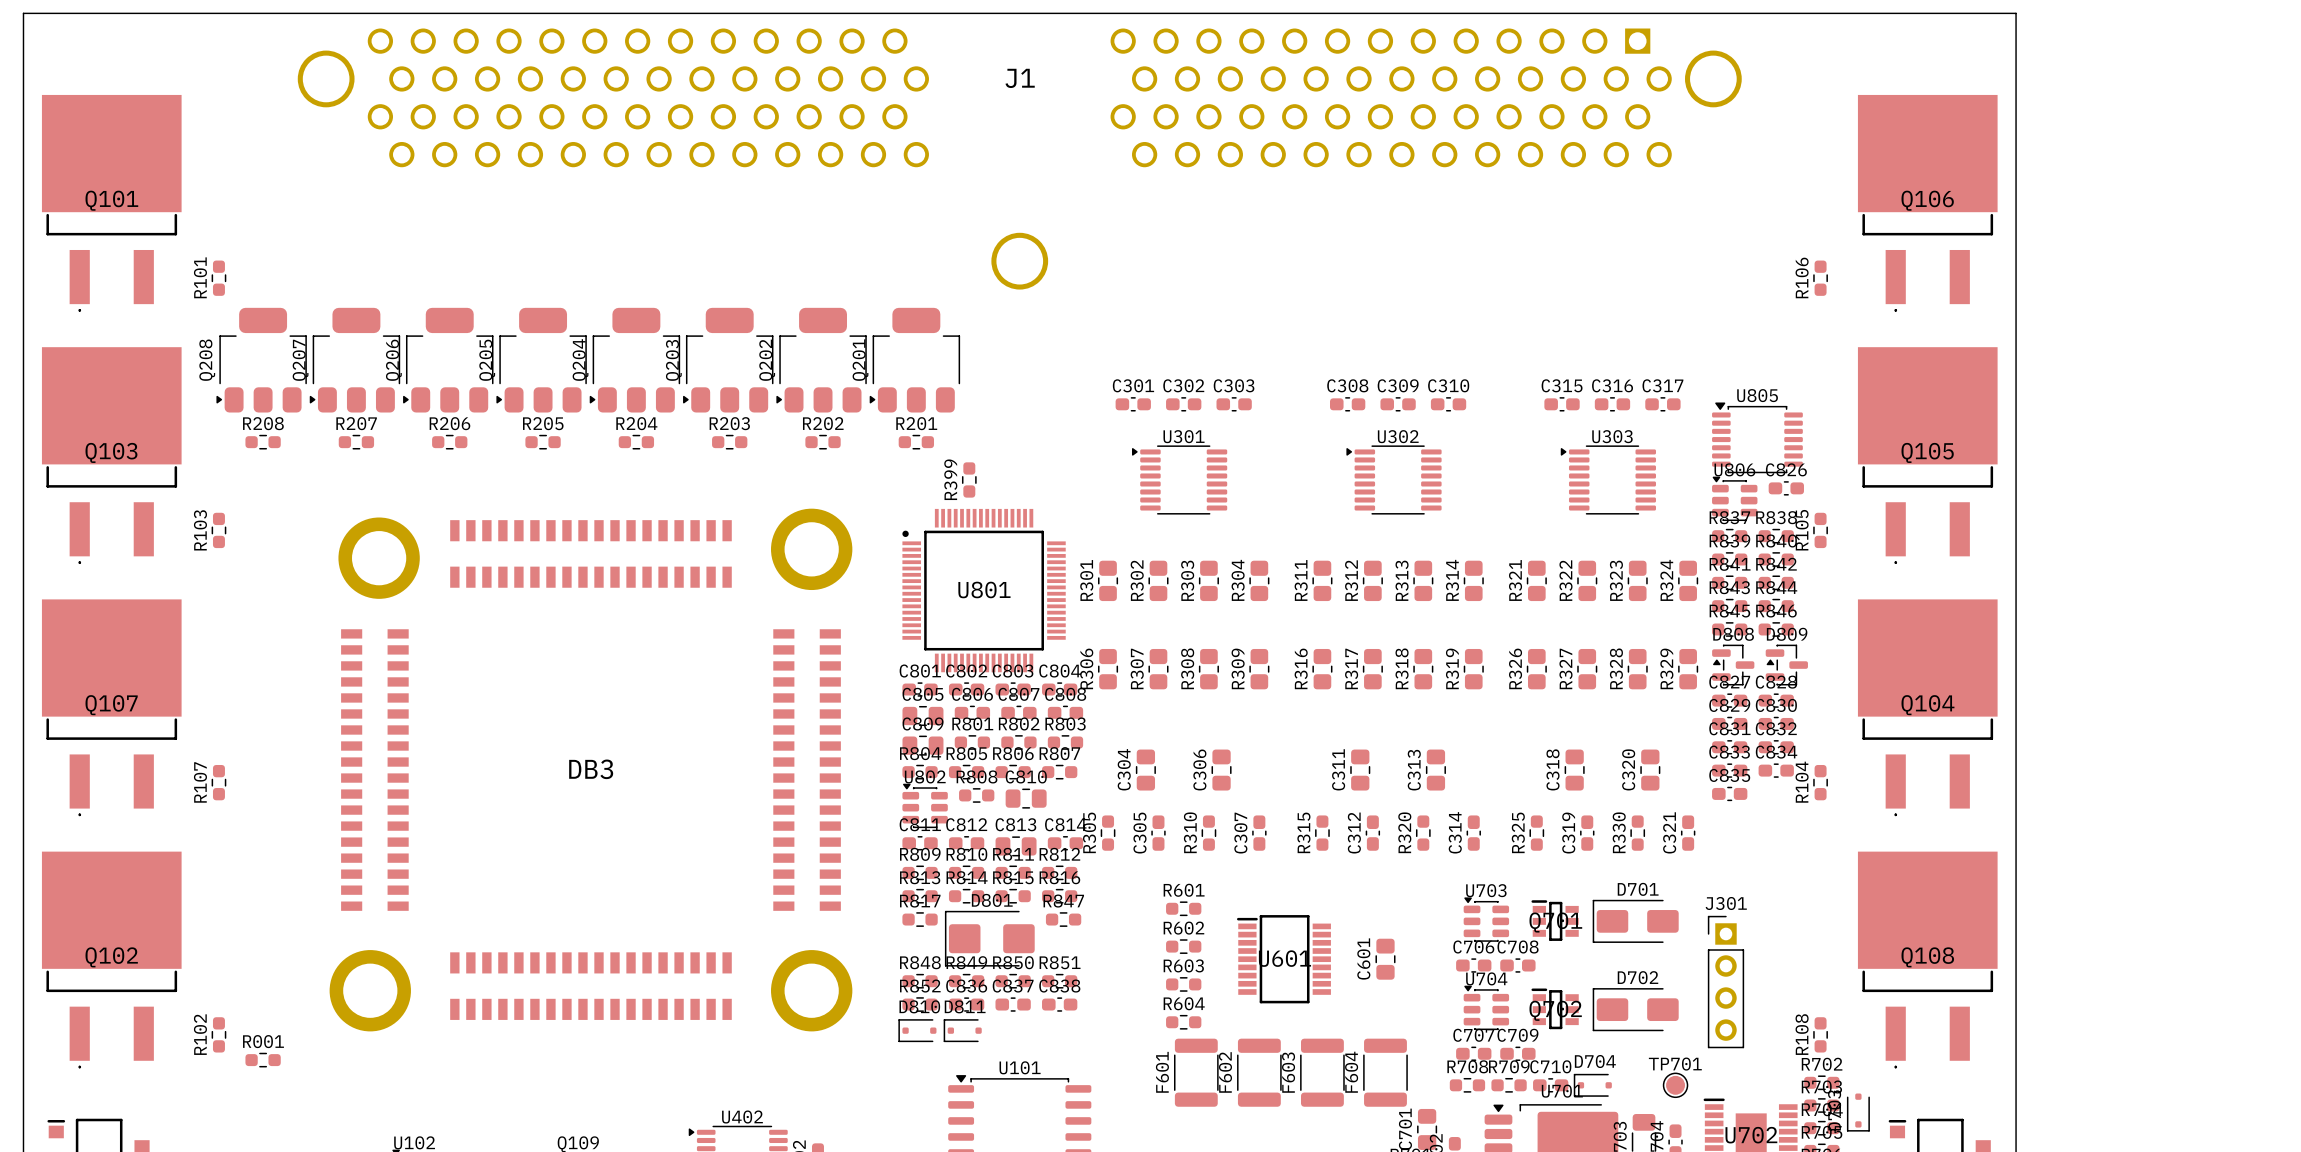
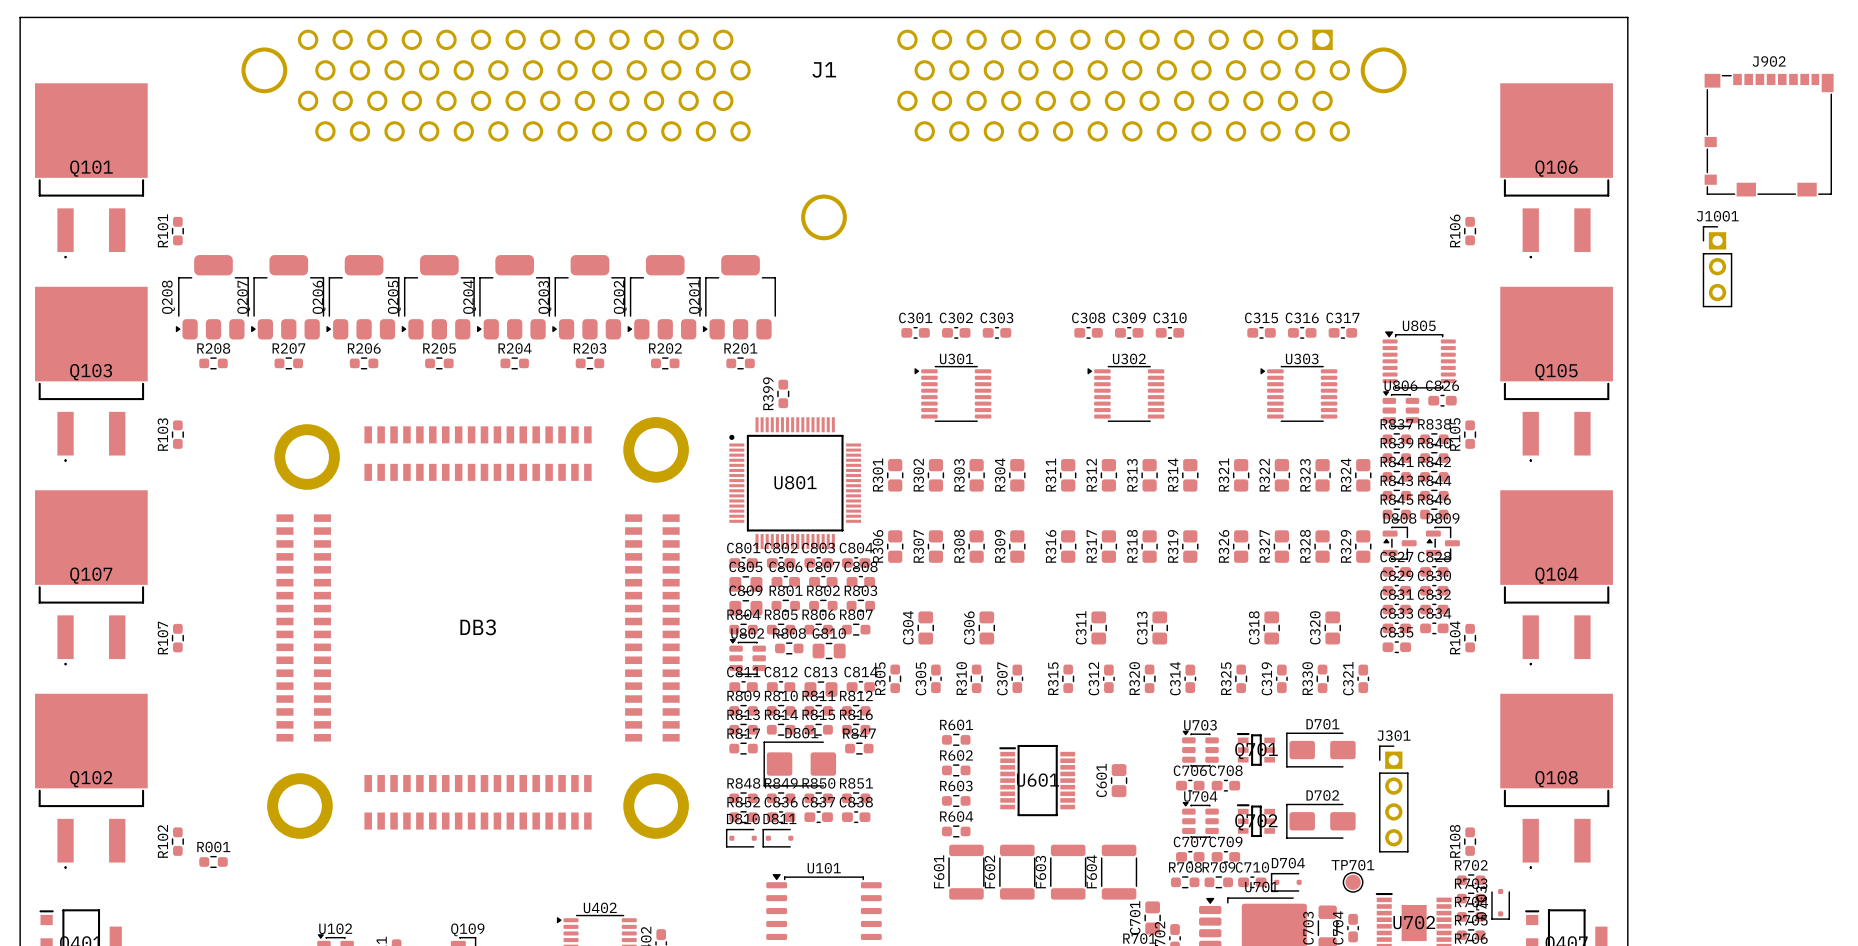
J902: none -> (1769, 135)
J1001: none -> (1717, 266)

